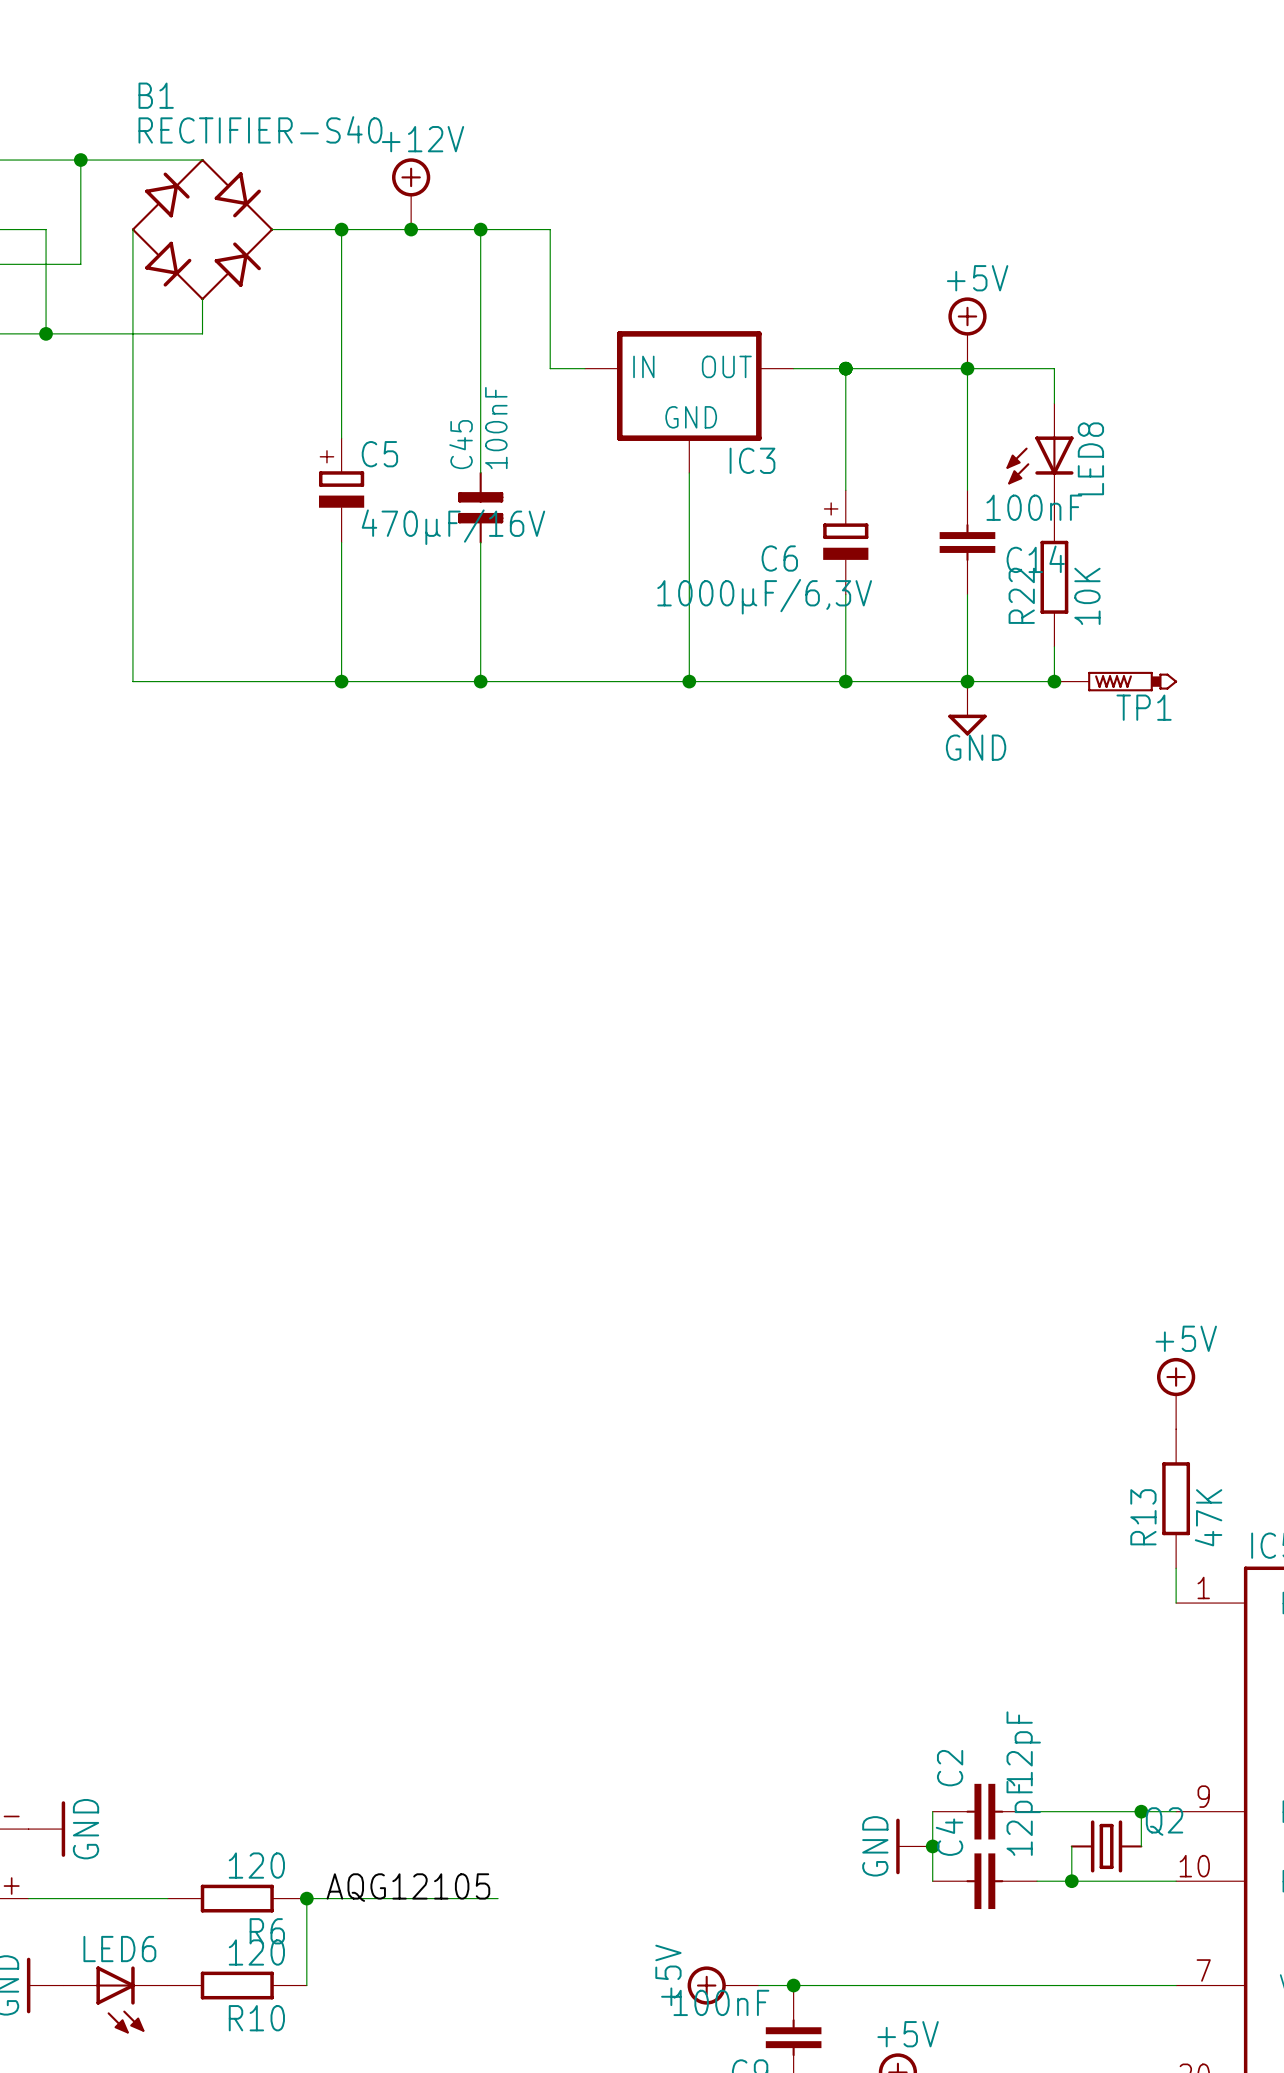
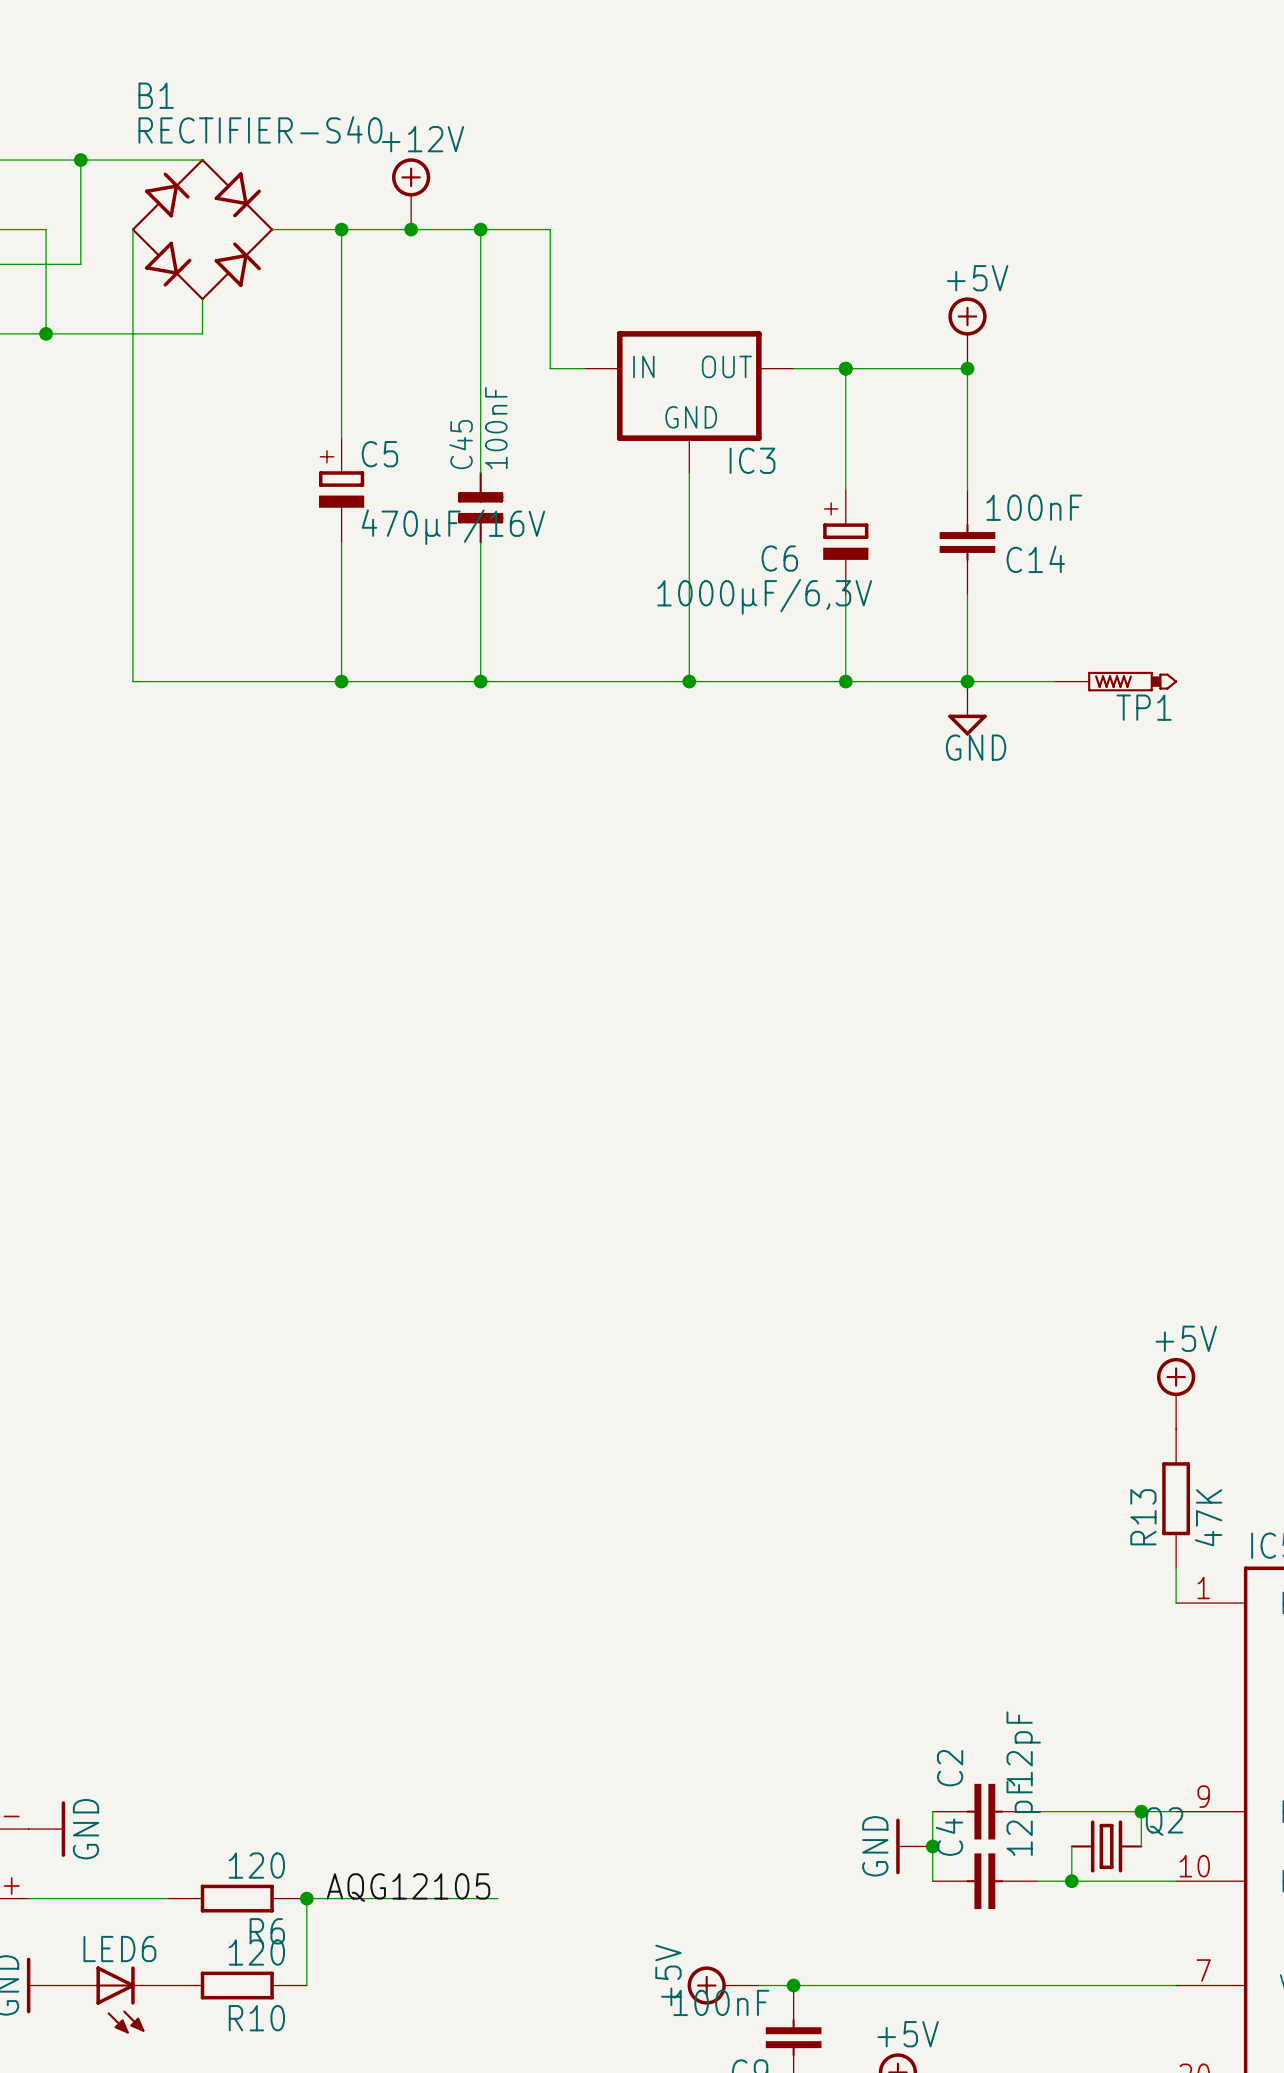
wire: (967, 368) (1054, 368) (1054, 403) -> none
LED8: (1039, 455) -> none
R22: 10K (1054, 577) -> none
wire: (1054, 646) (1054, 681) -> none
junction: (1054, 681) -> none

